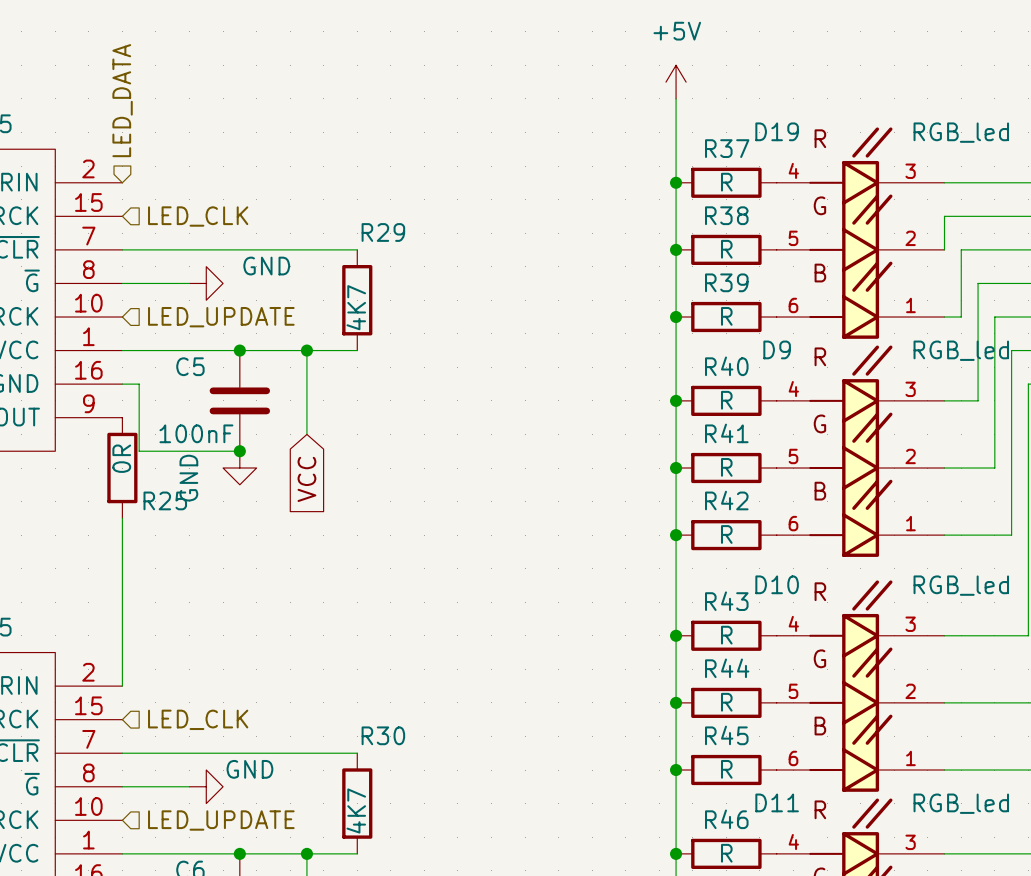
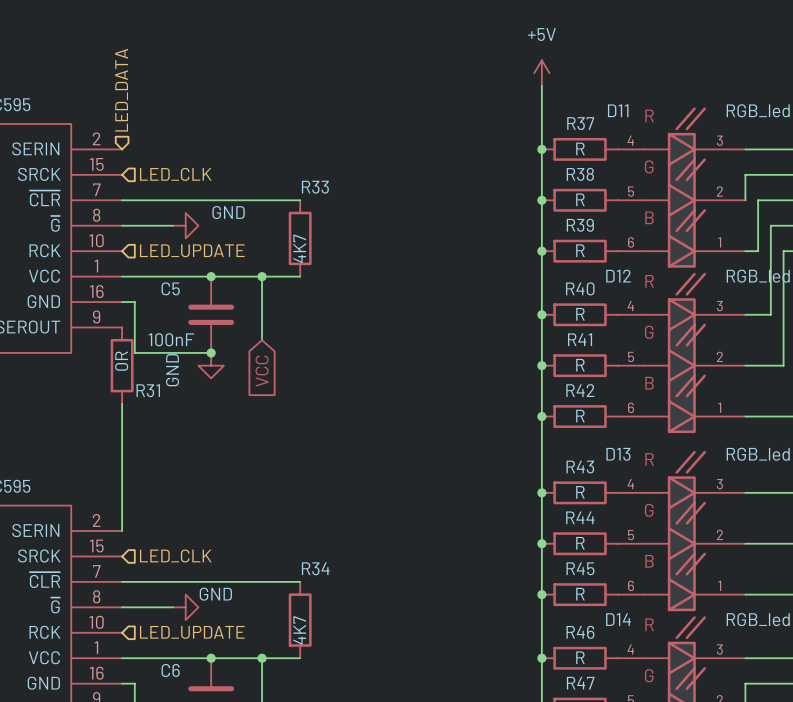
D19 name: D19 (777, 131) -> D11 (618, 110)
R29 name: R29 (383, 232) -> R33 (315, 187)
D9 name: D9 (777, 349) -> D12 (618, 276)
R25 name: R25 (165, 500) -> R31 (148, 390)
D10 name: D10 (777, 584) -> D13 (618, 454)
R30 name: R30 (383, 735) -> R34 (315, 568)
D11 name: D11 (777, 802) -> D14 (618, 619)

